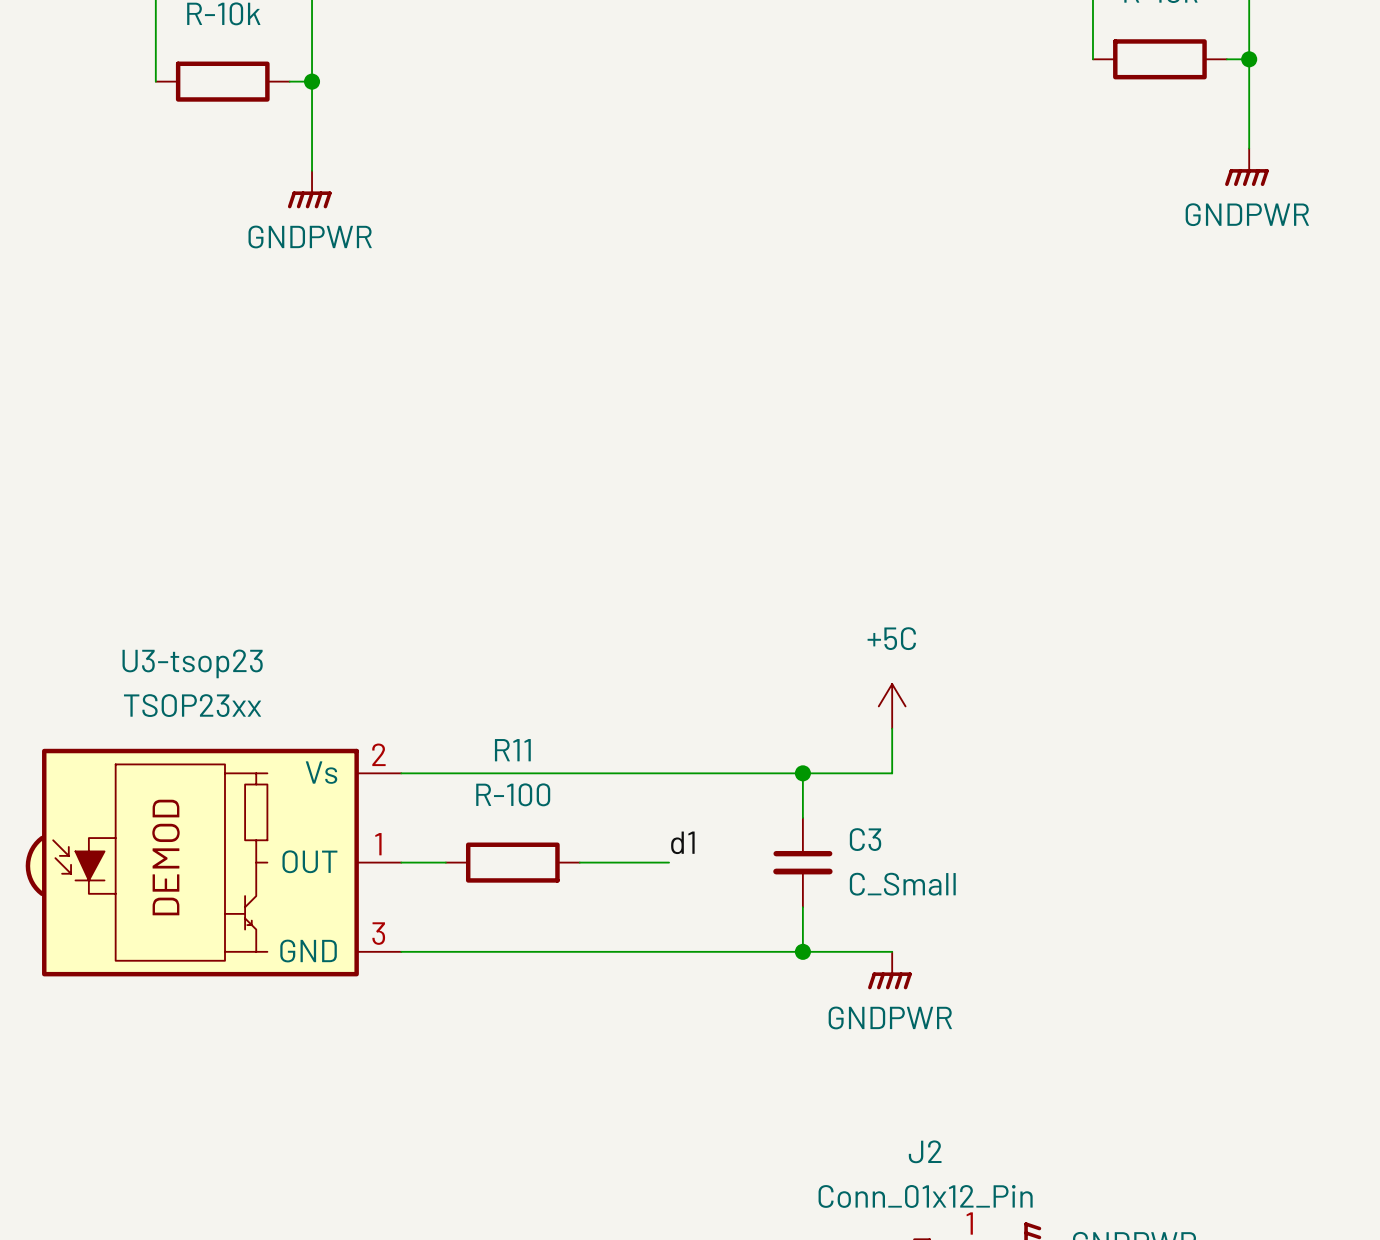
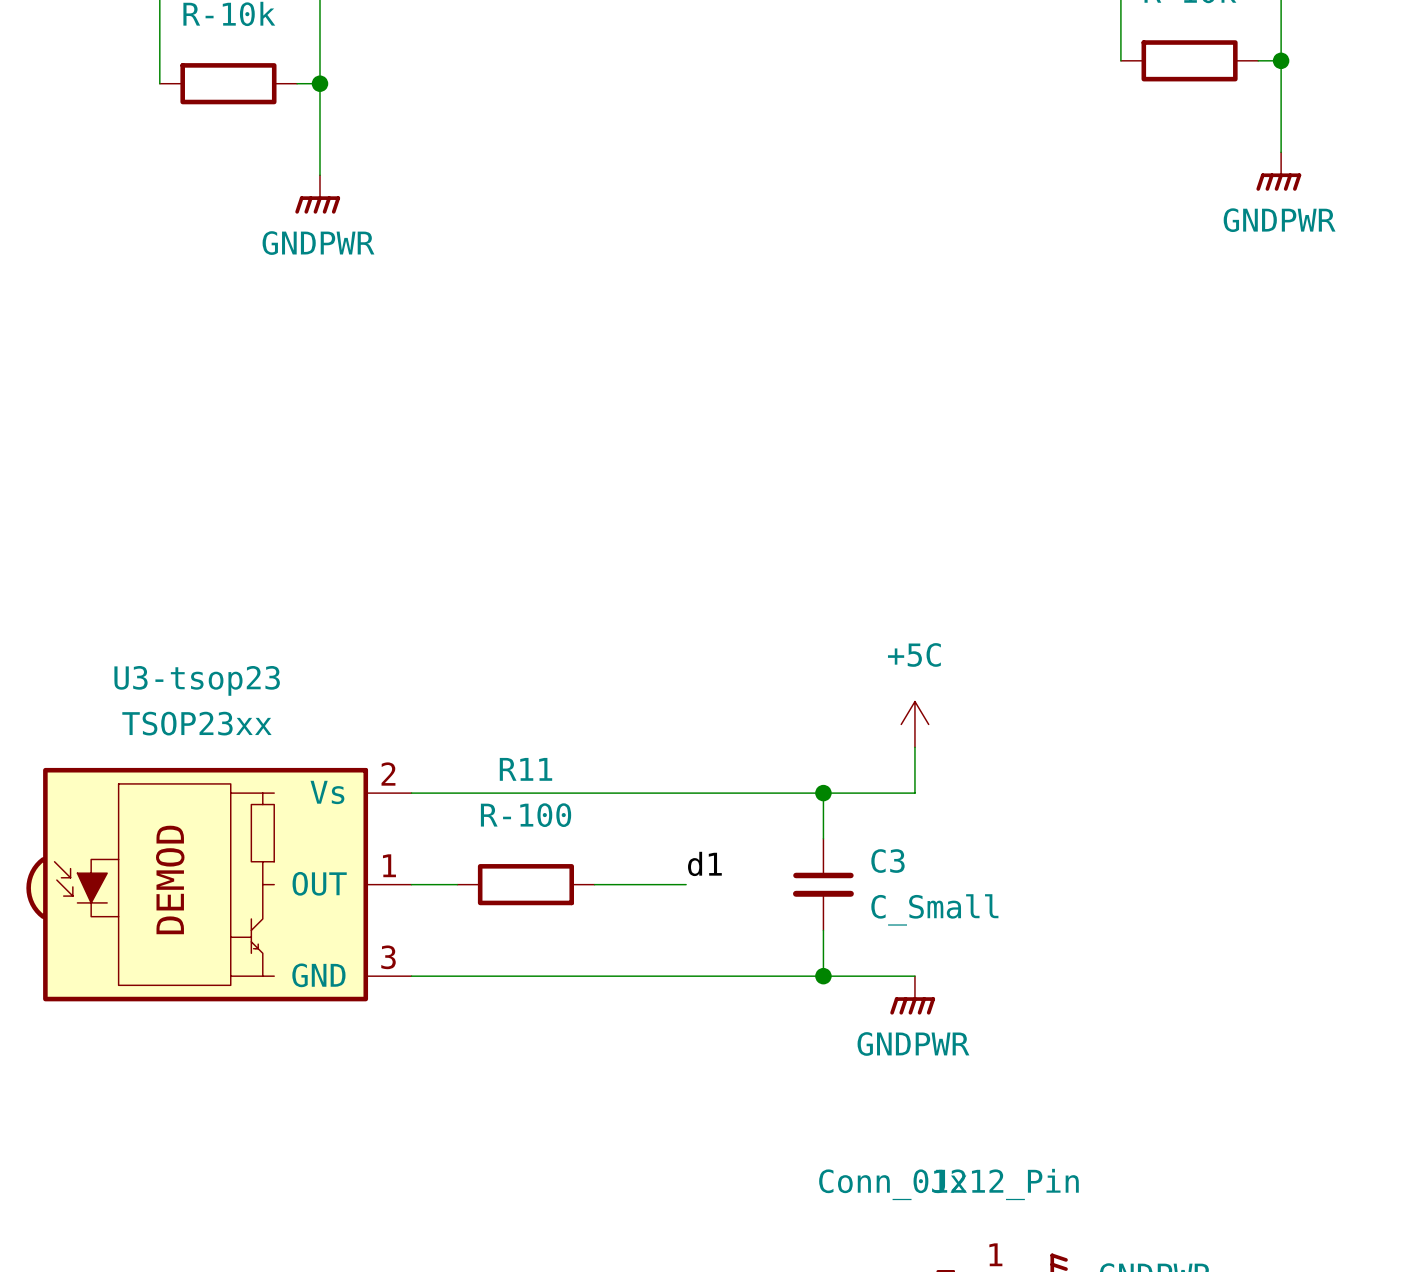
J2 value position: Conn_01x12_Pin (925, 1196) -> Conn_01x12_Pin (948, 1184)

